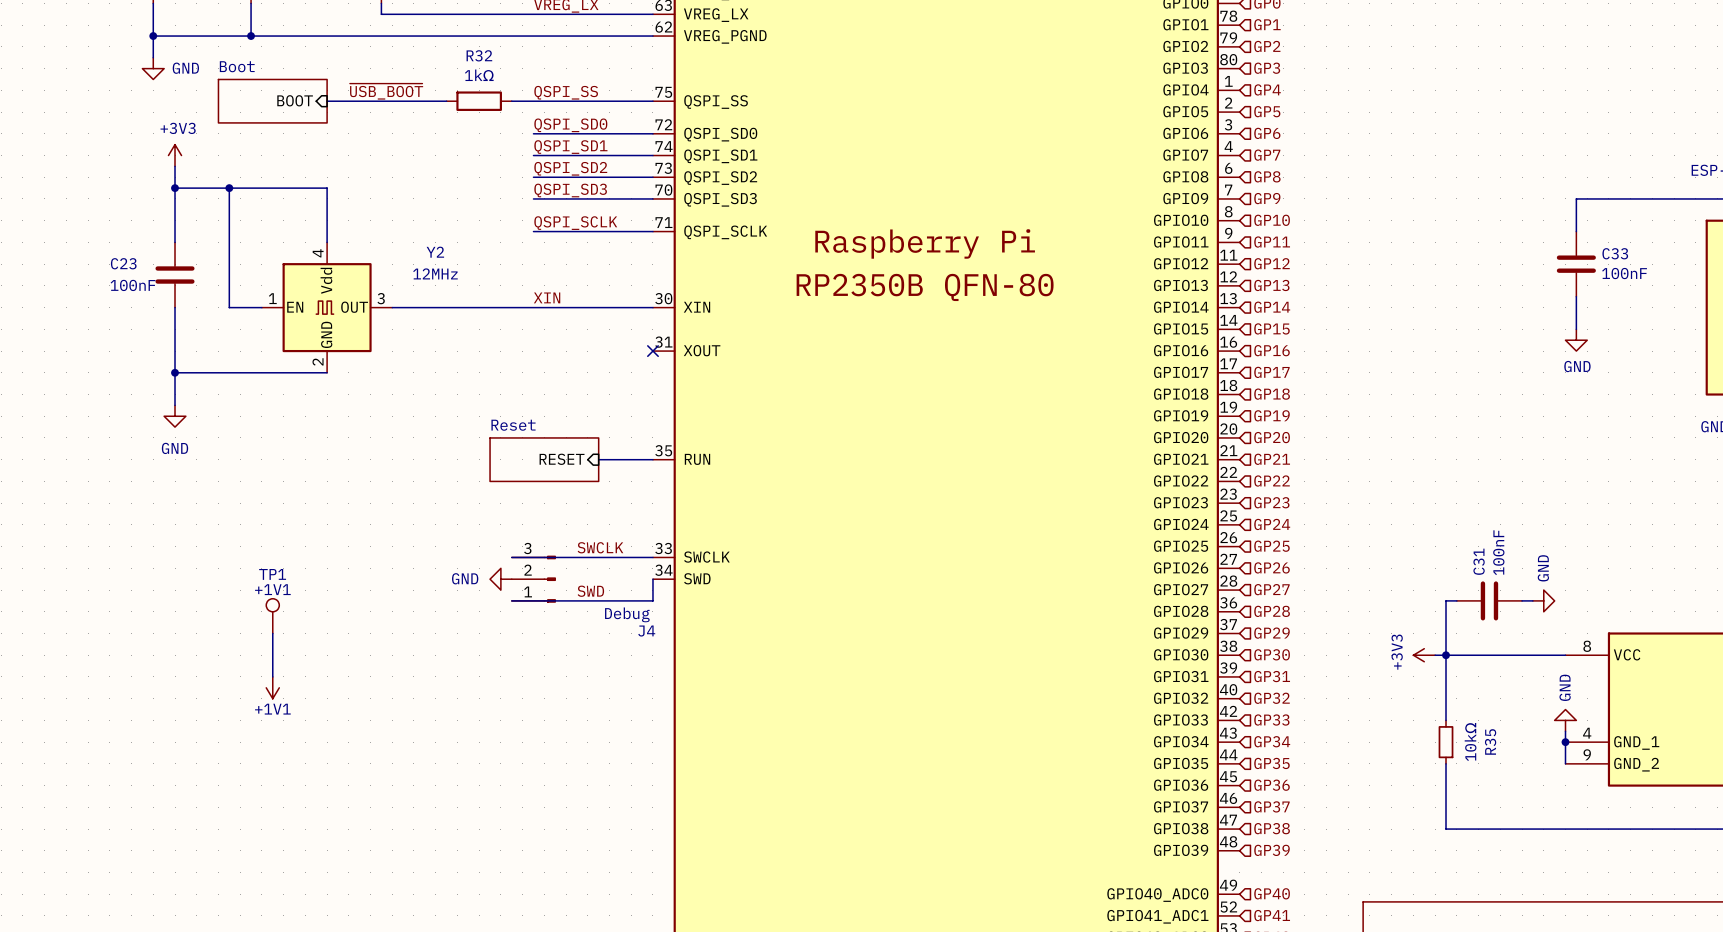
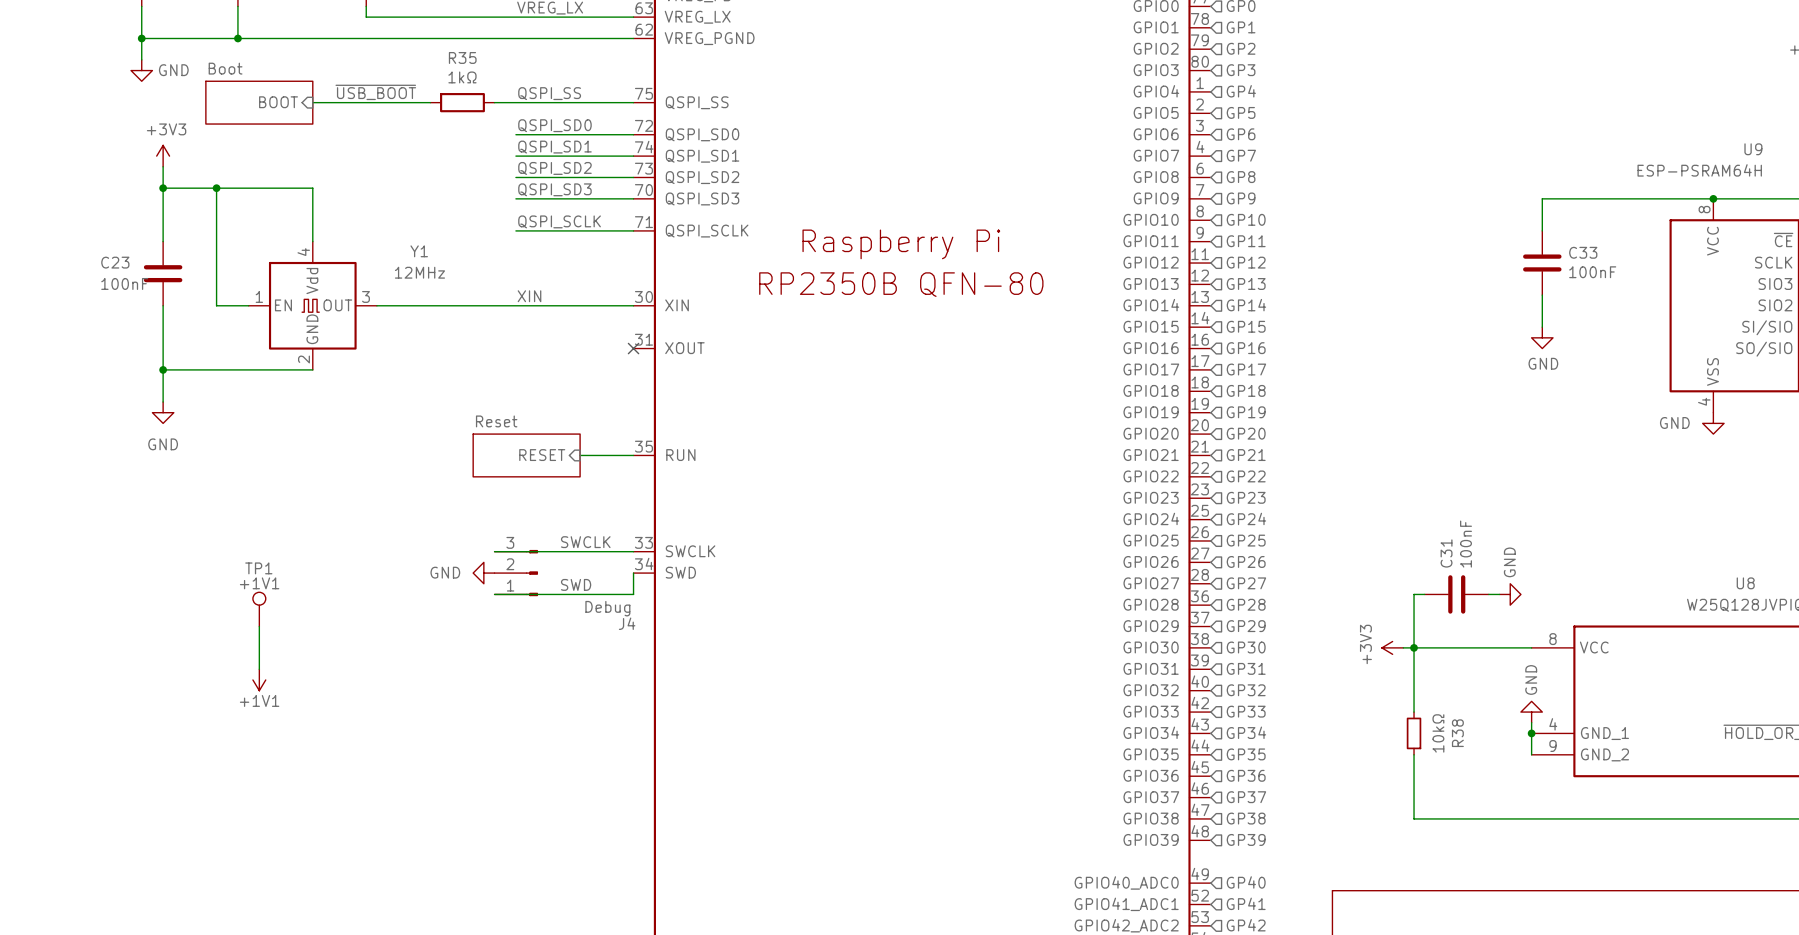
R32 name: R32 (479, 55) -> R35 (462, 57)
Y2 name: Y2 (435, 252) -> Y1 (419, 251)
R35 name: R35 (1490, 741) -> R38 (1457, 733)

